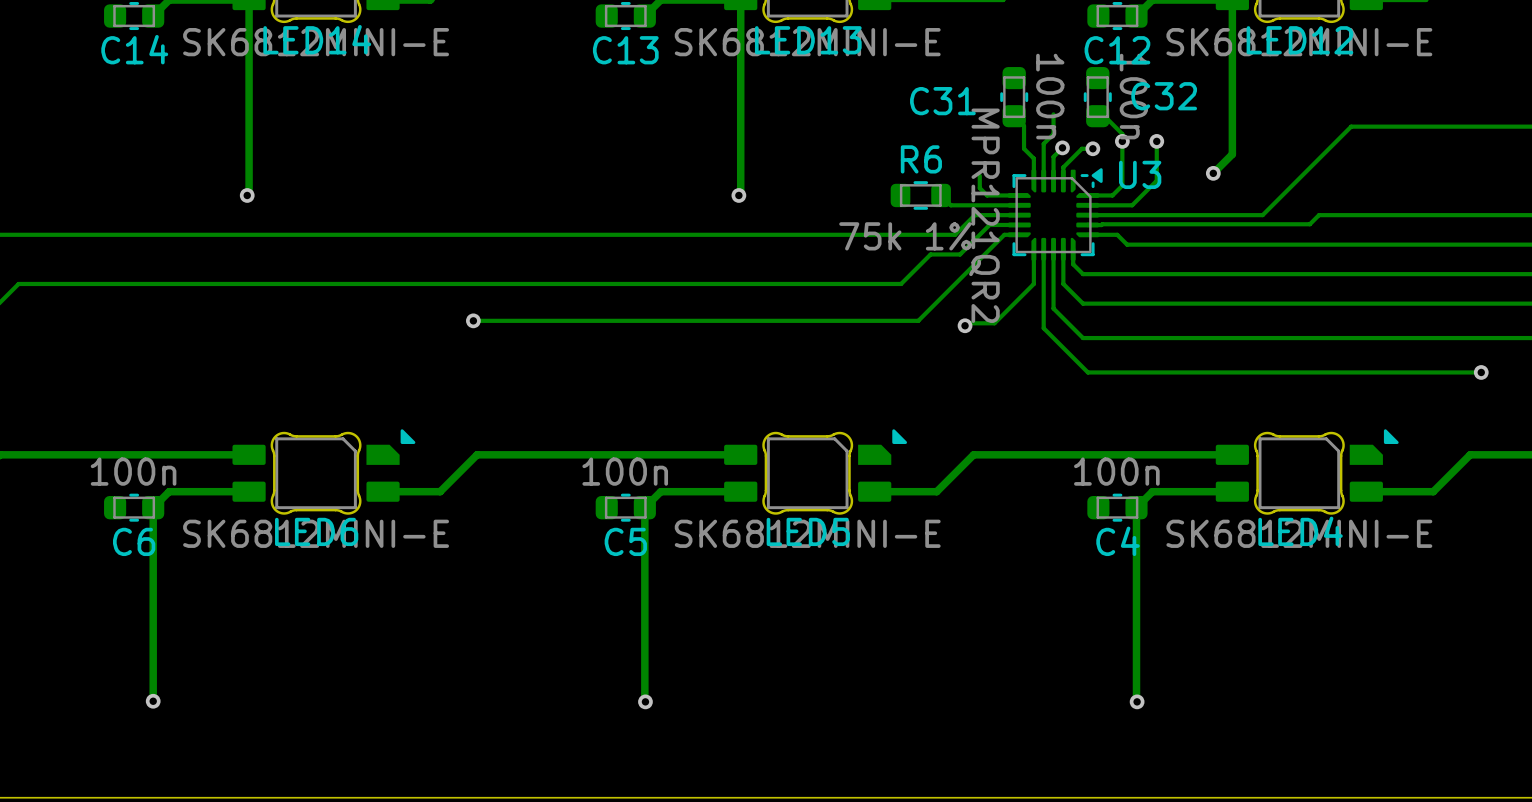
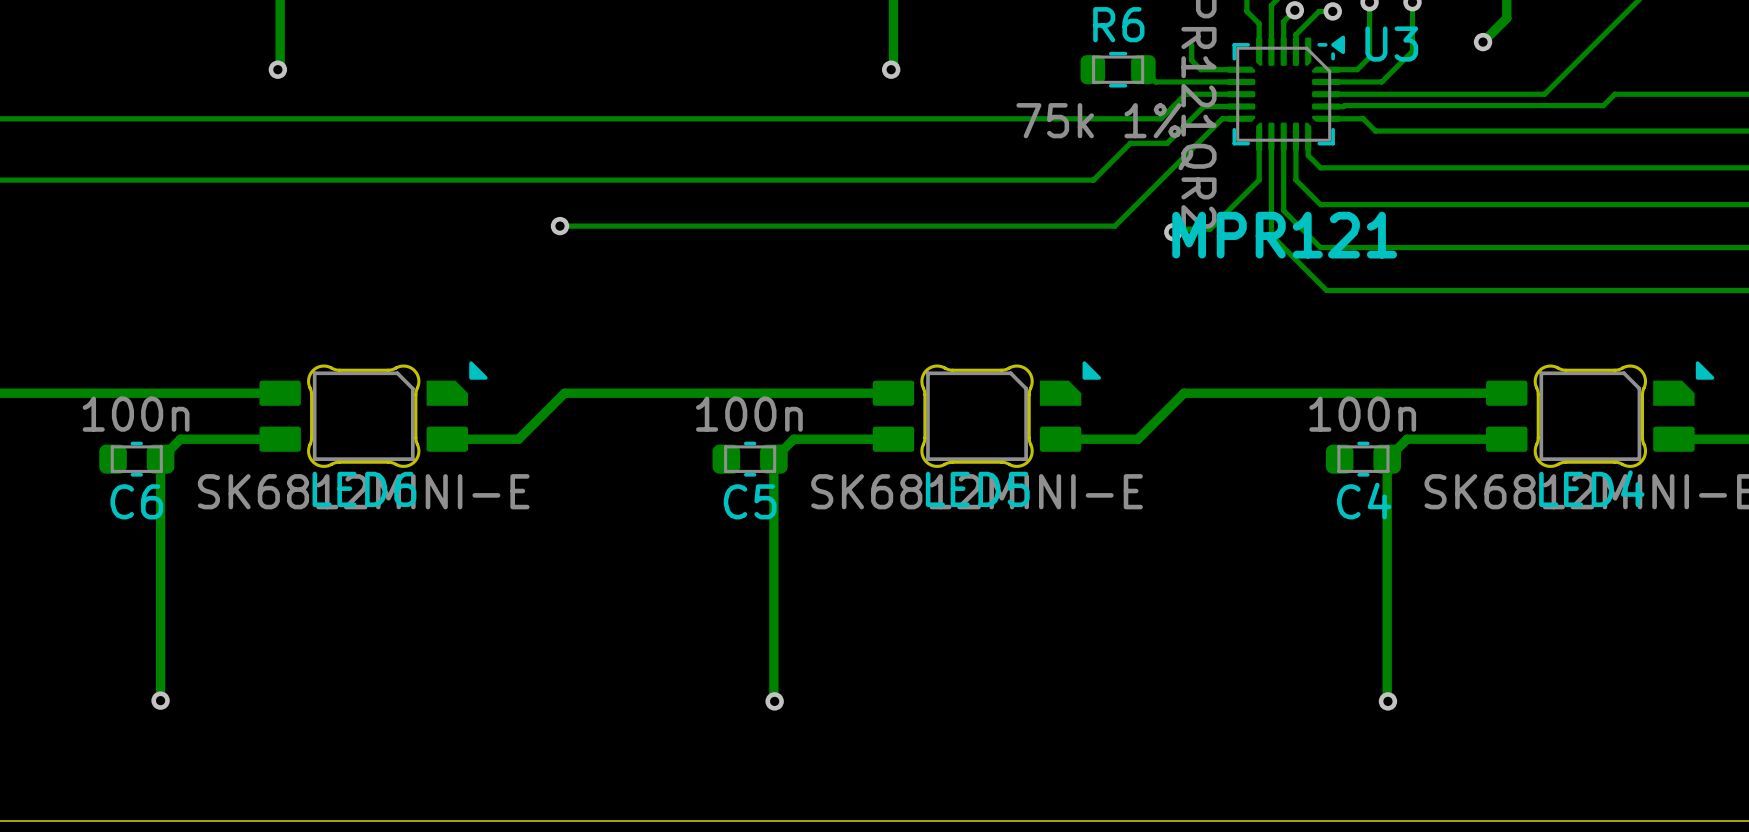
text: none -> MPR121 (1284, 235)

